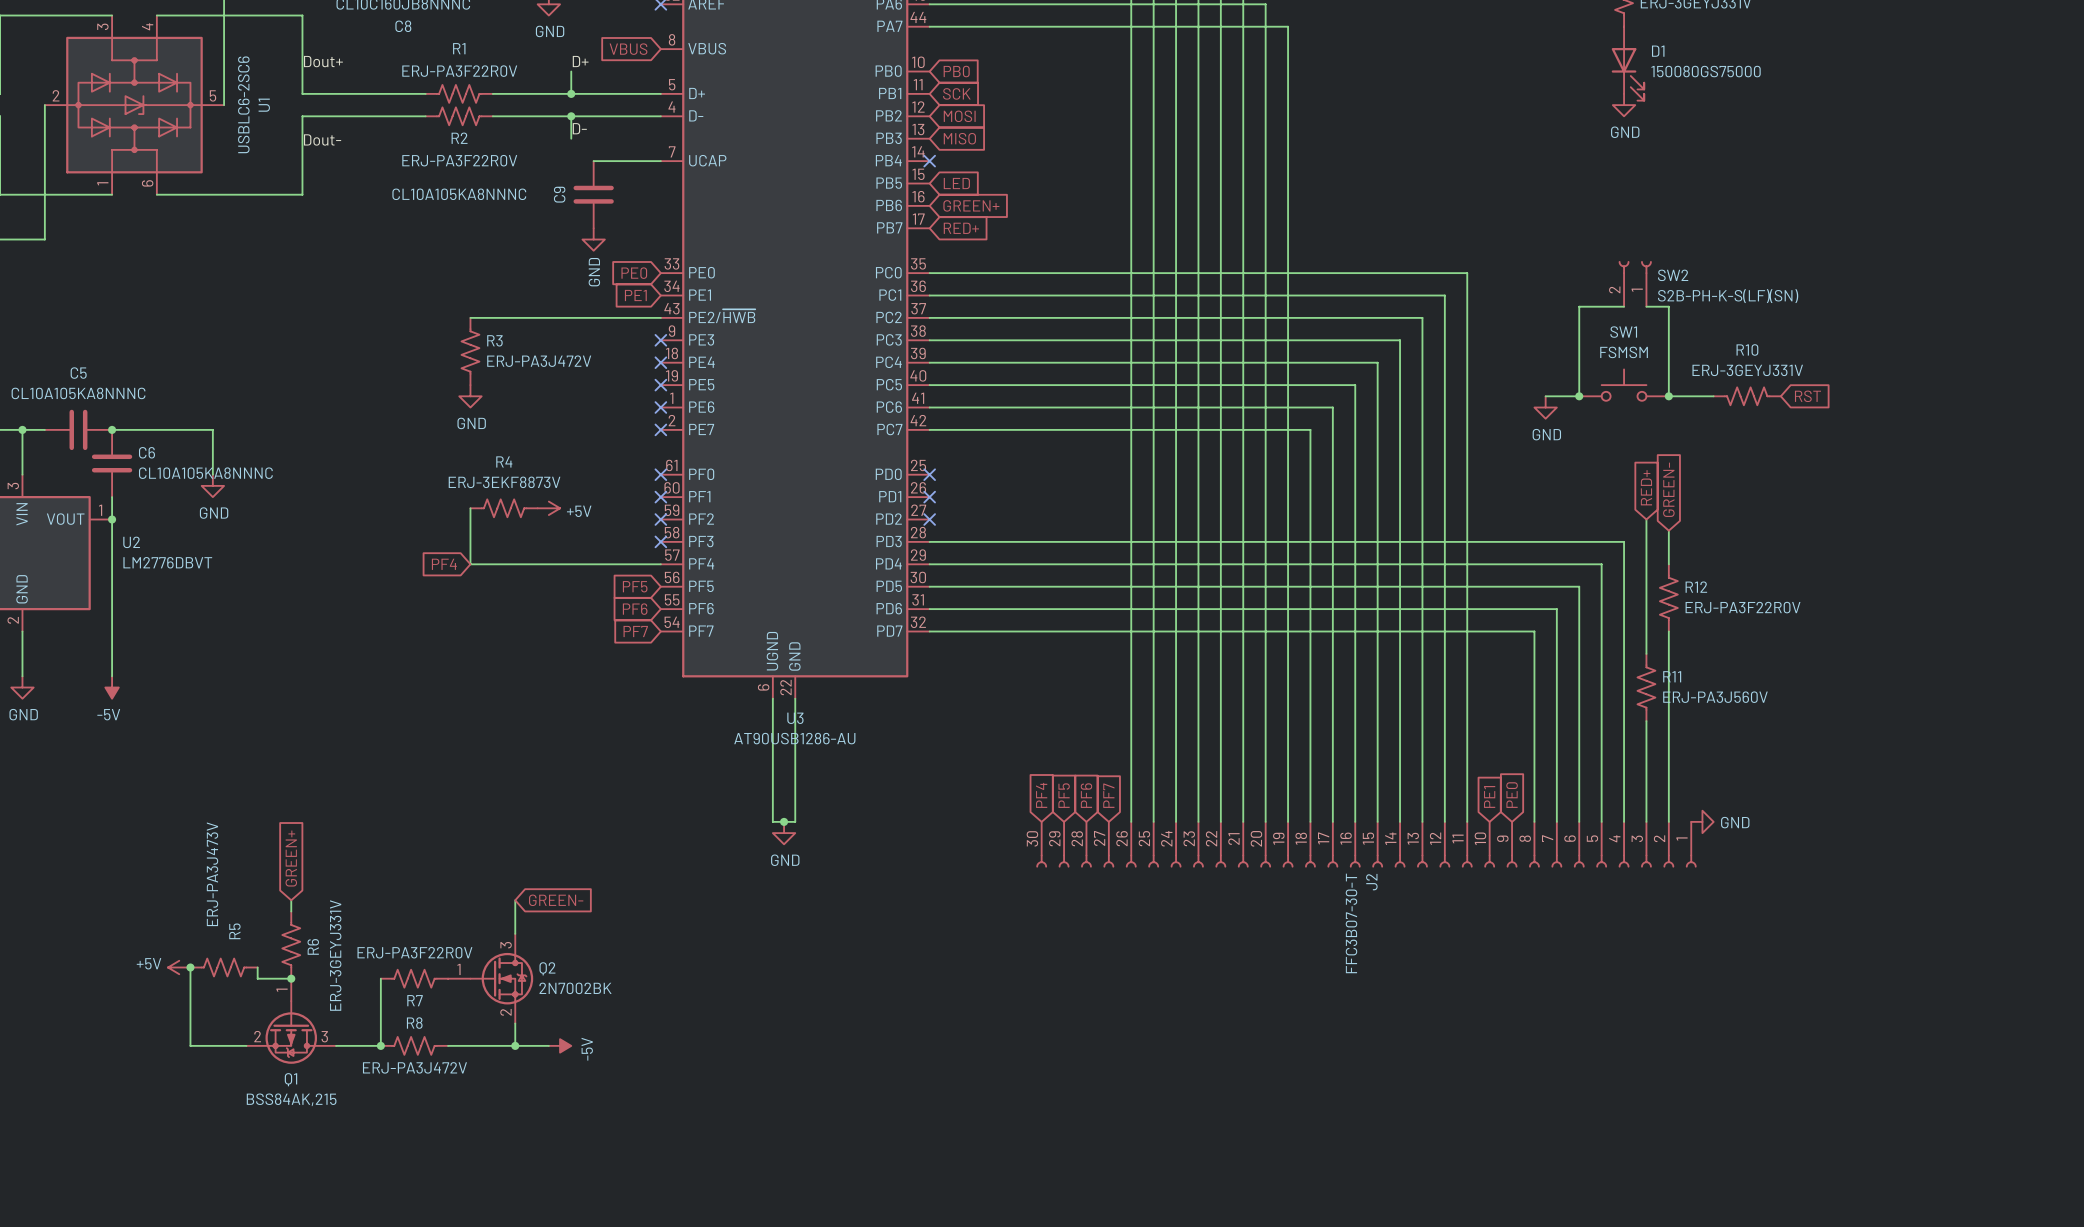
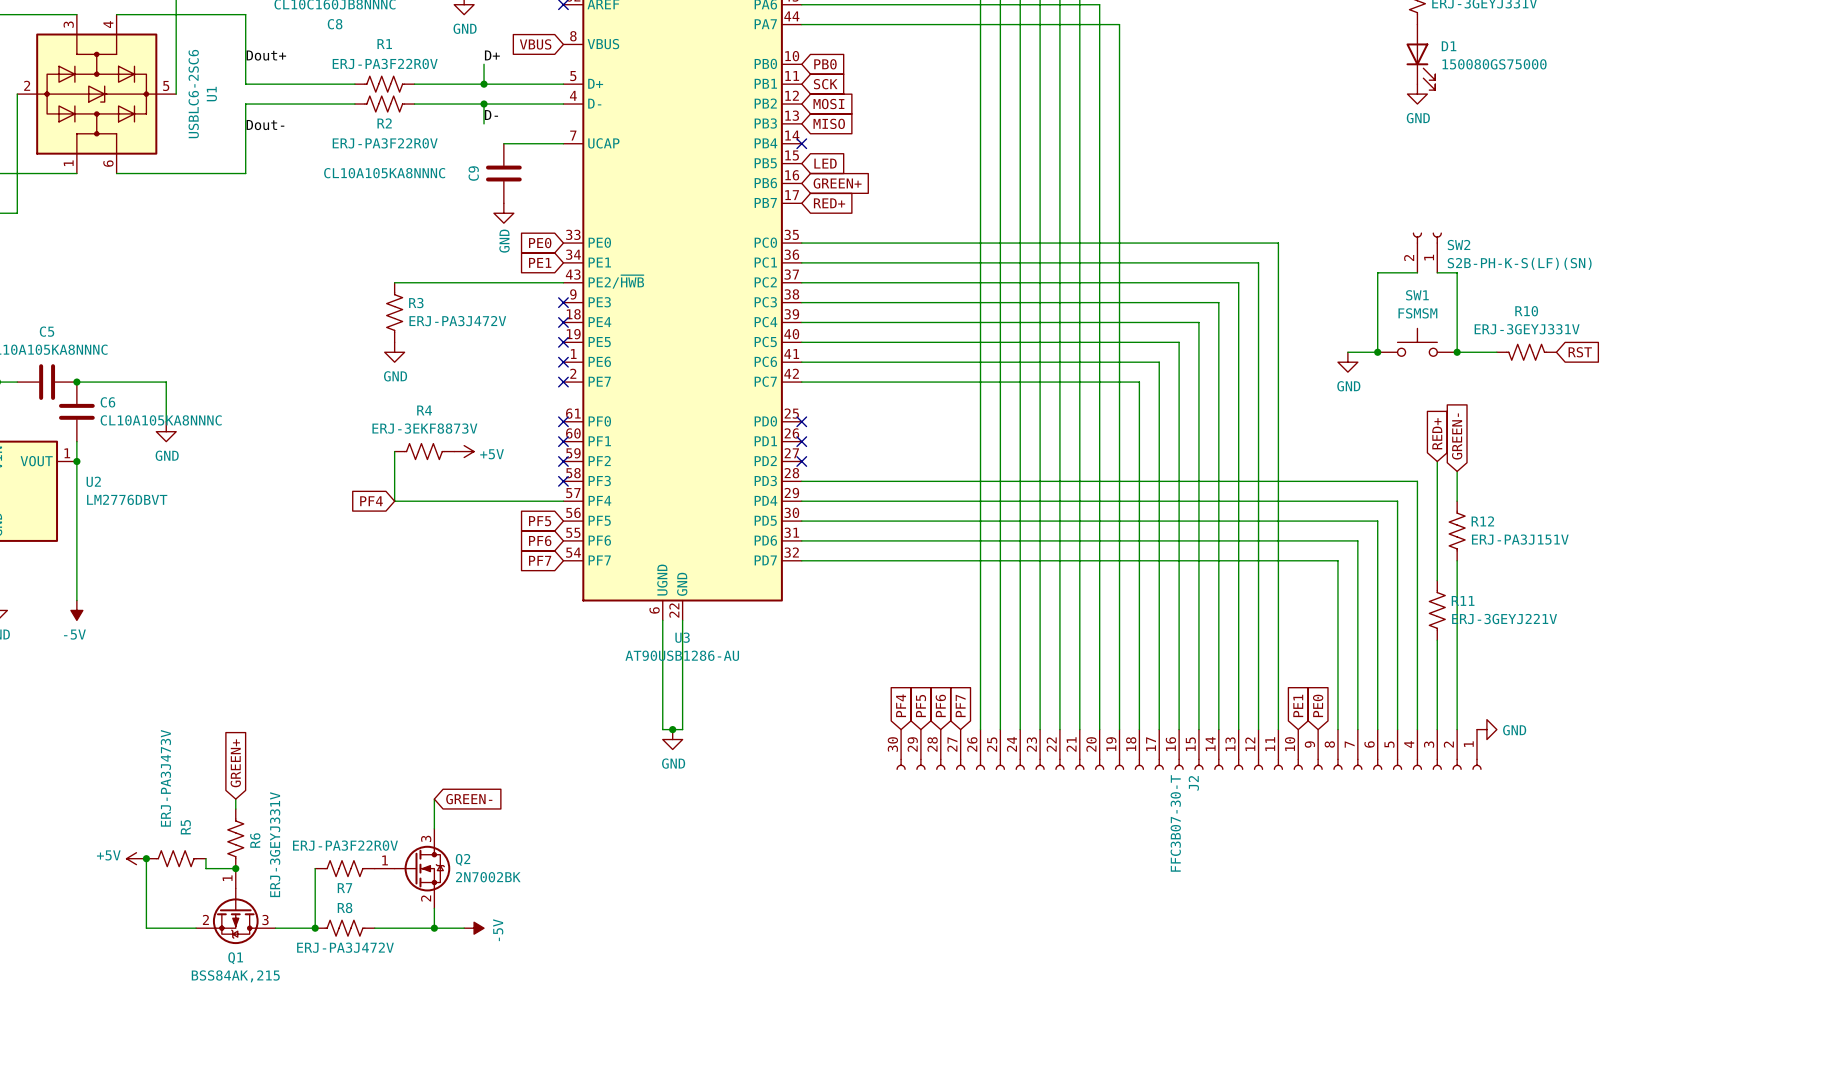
R12 value: ERJ-PA3F22R0V (1743, 607) -> ERJ-PA3J151V (1520, 539)
R11 value: ERJ-PA3J560V (1715, 697) -> ERJ-3GEYJ221V (1504, 619)

